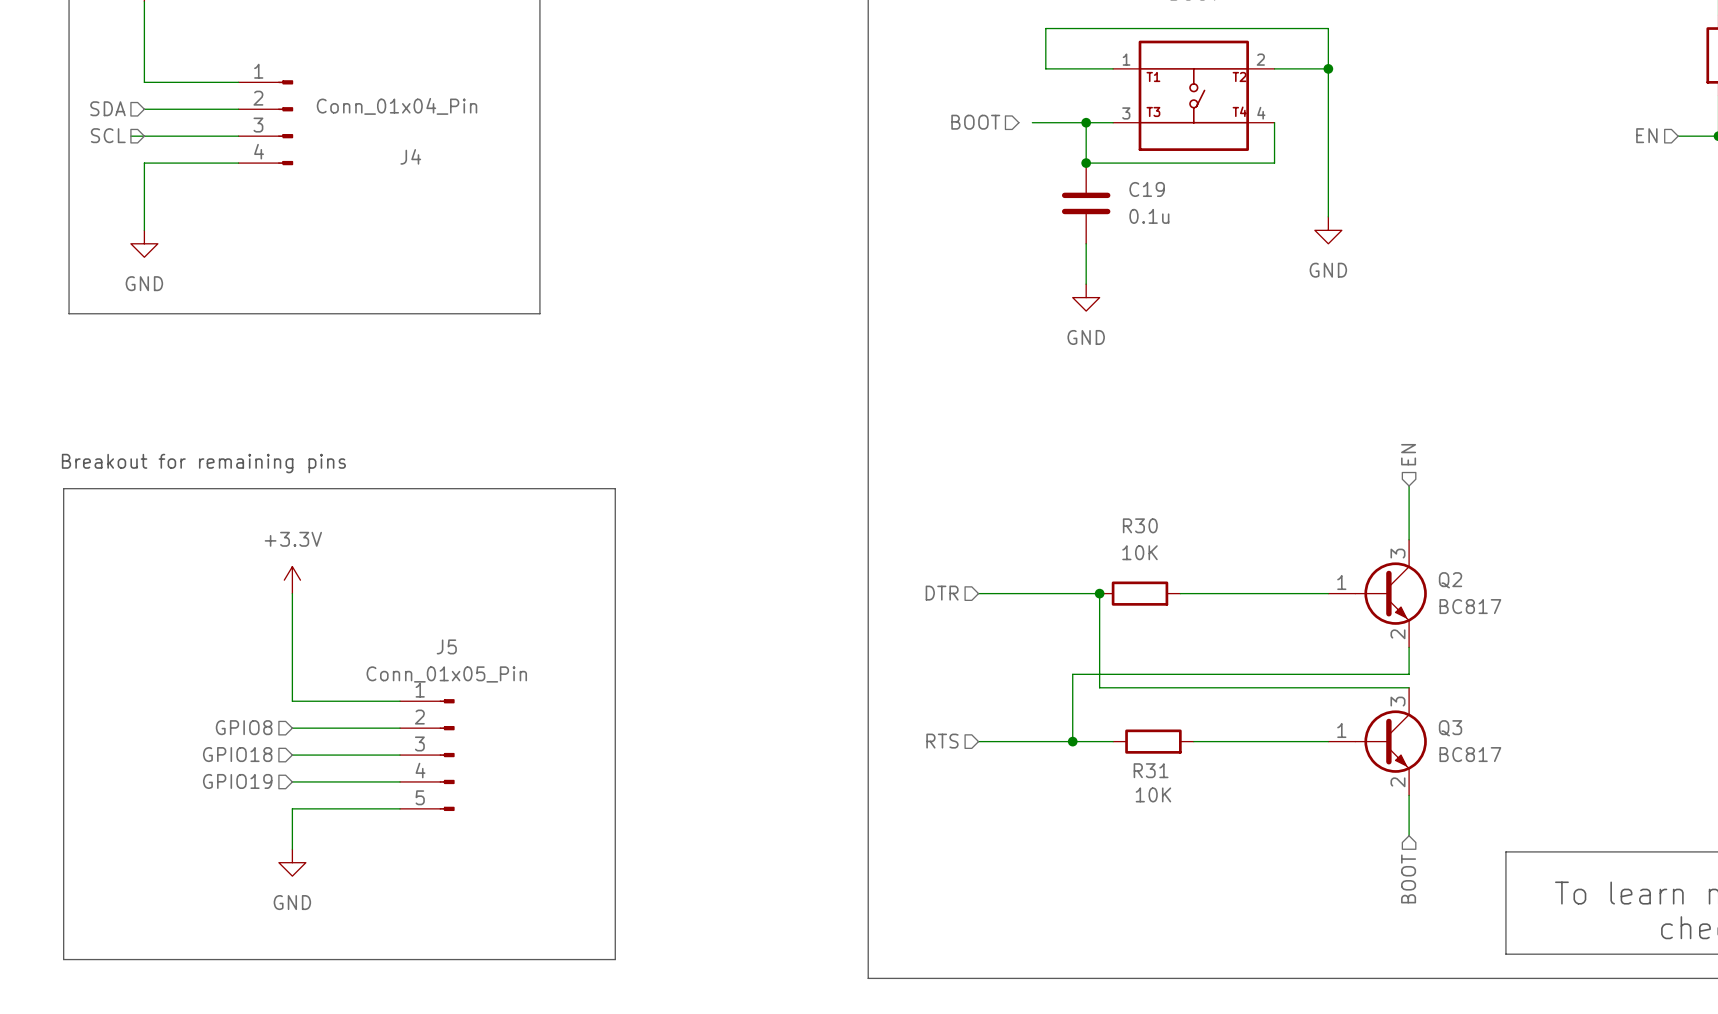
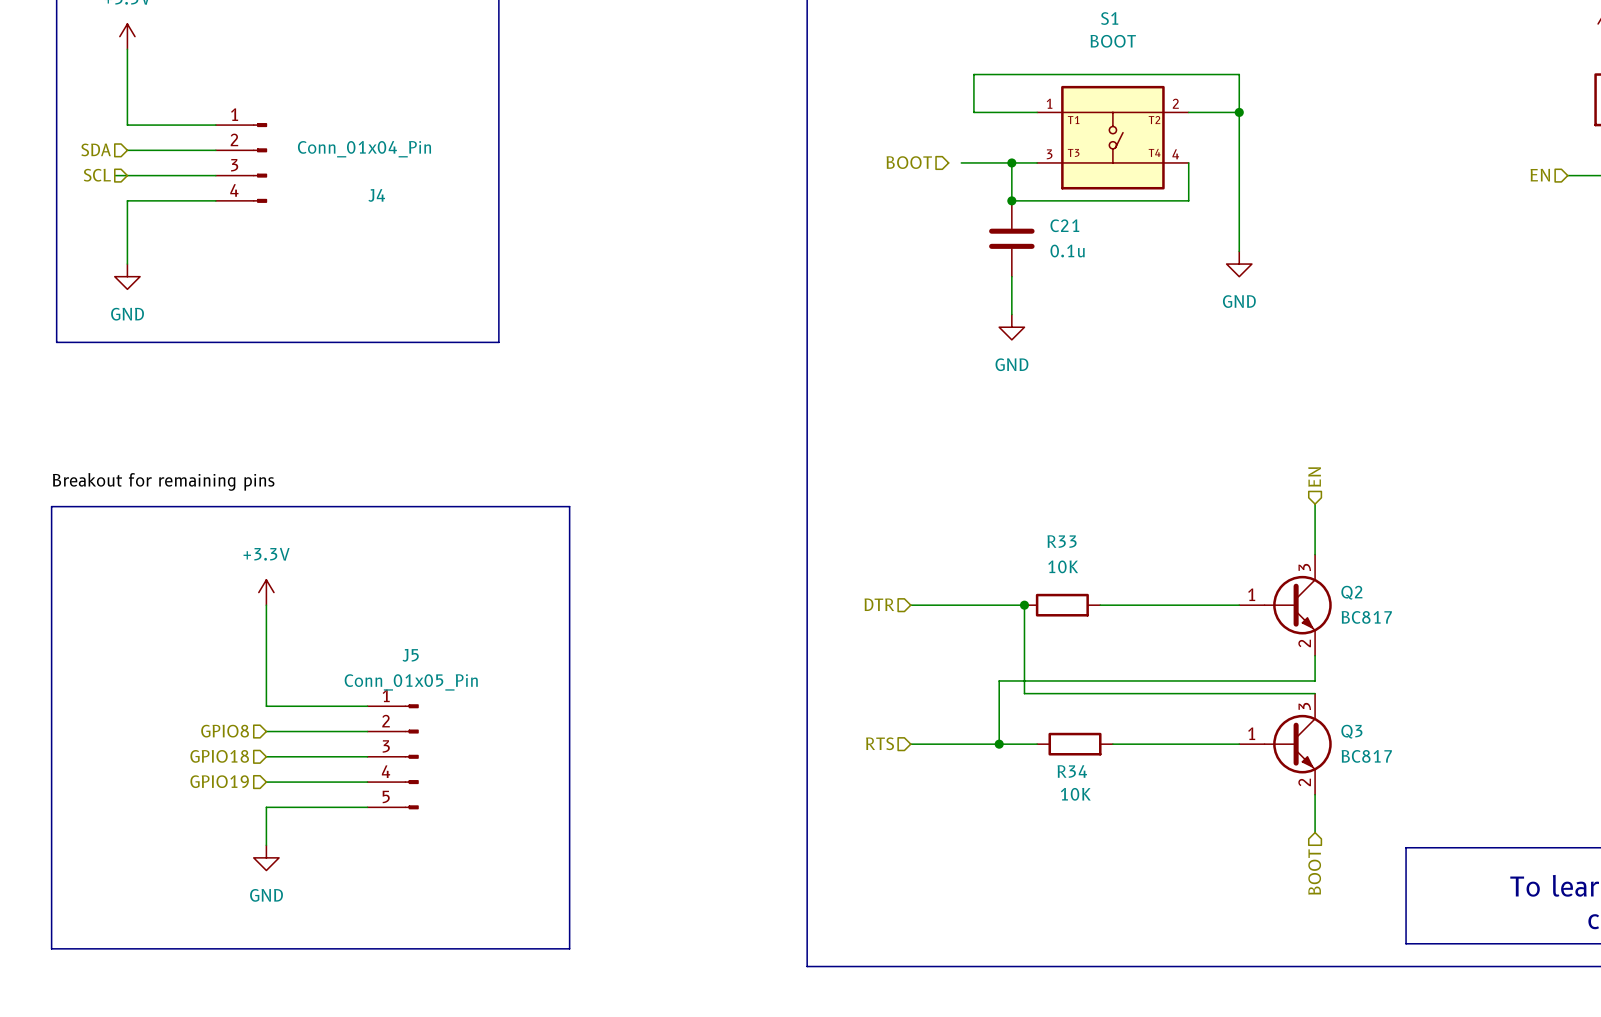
C19 name: C19 (1147, 189) -> C21 (1064, 225)
label: none -> Breakout for remaining pins (163, 481)
text: Breakout for remaining pins (203, 463) -> none
R30 name: R30 (1140, 525) -> R33 (1062, 541)
R31 name: R31 (1151, 770) -> R34 (1072, 771)

